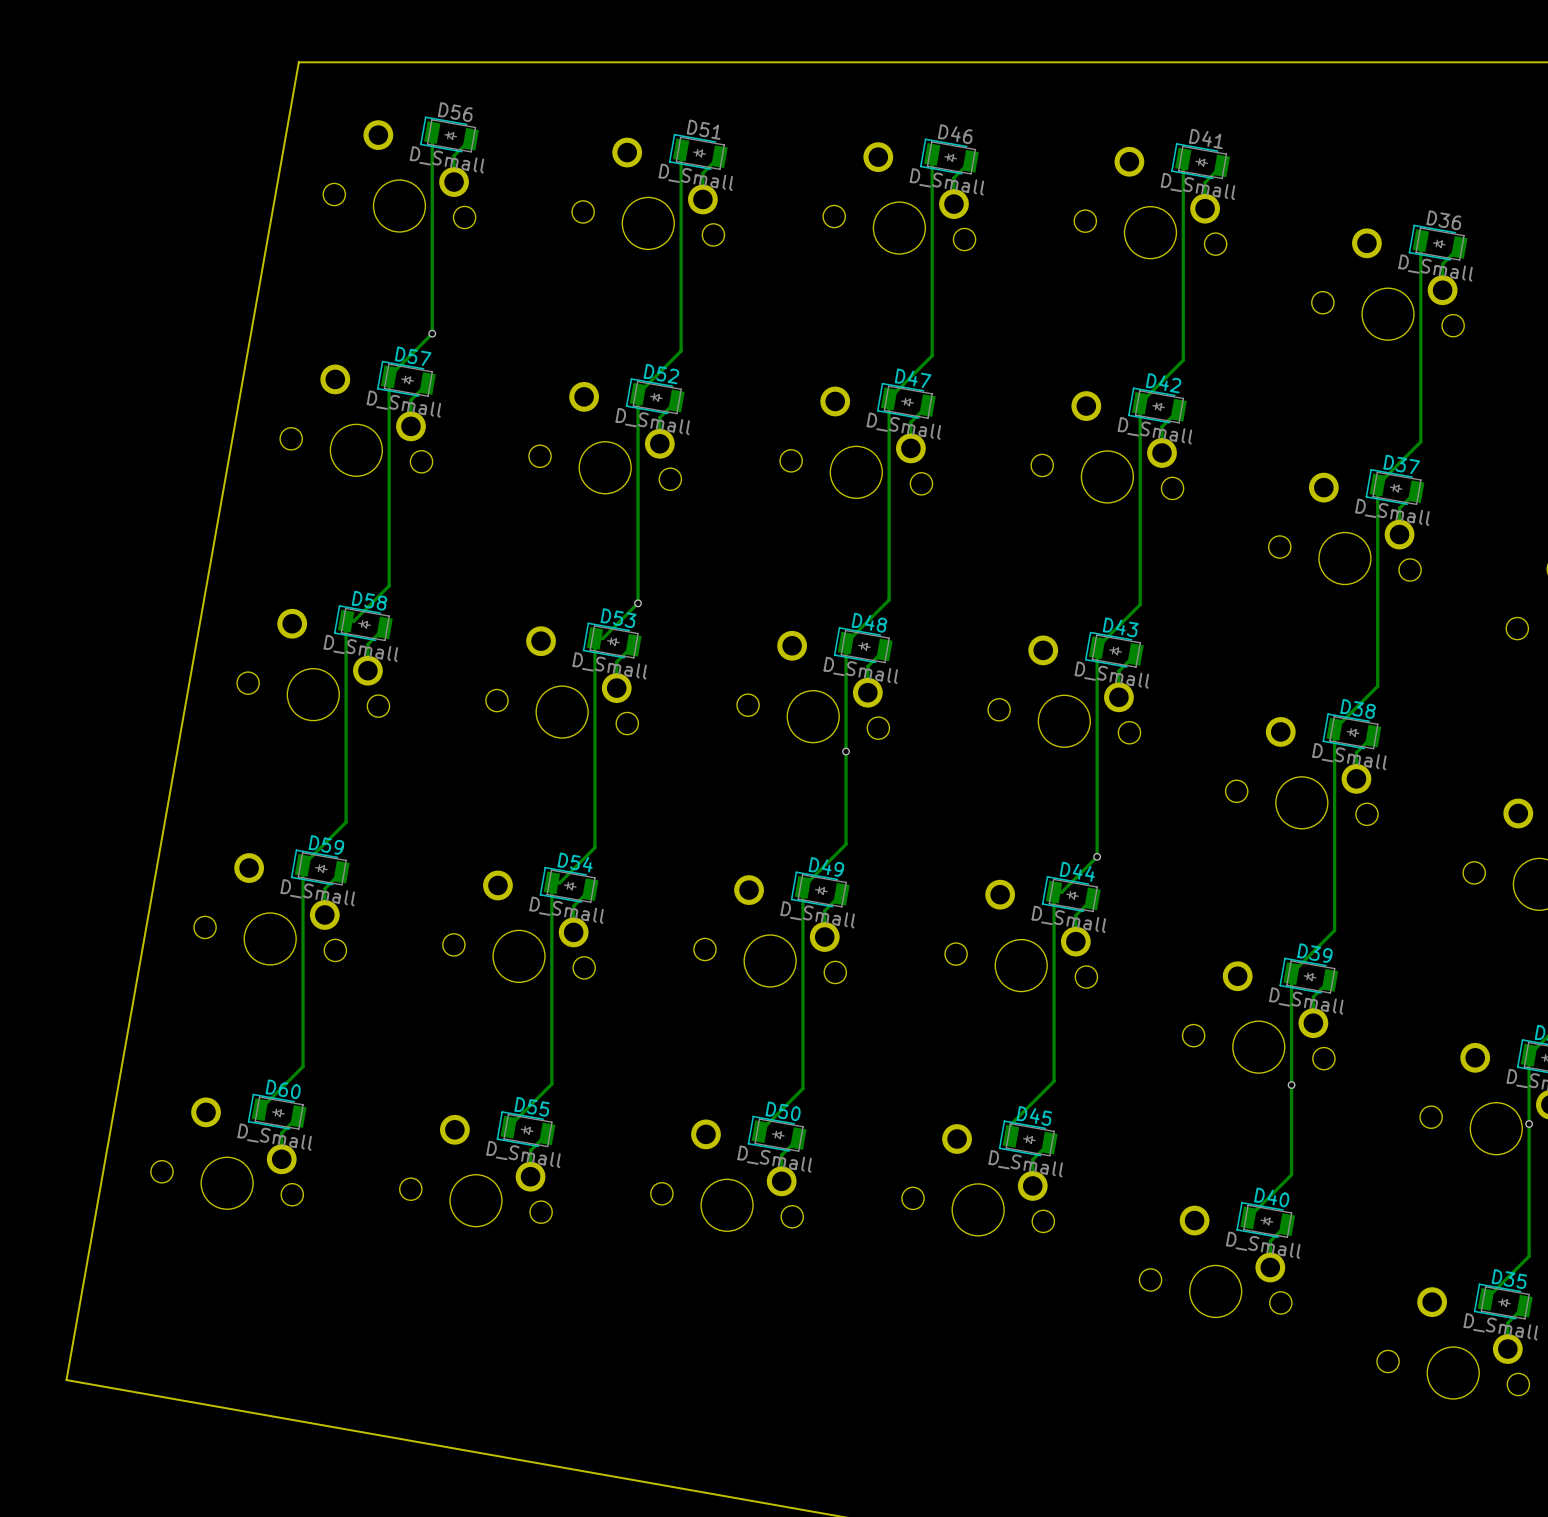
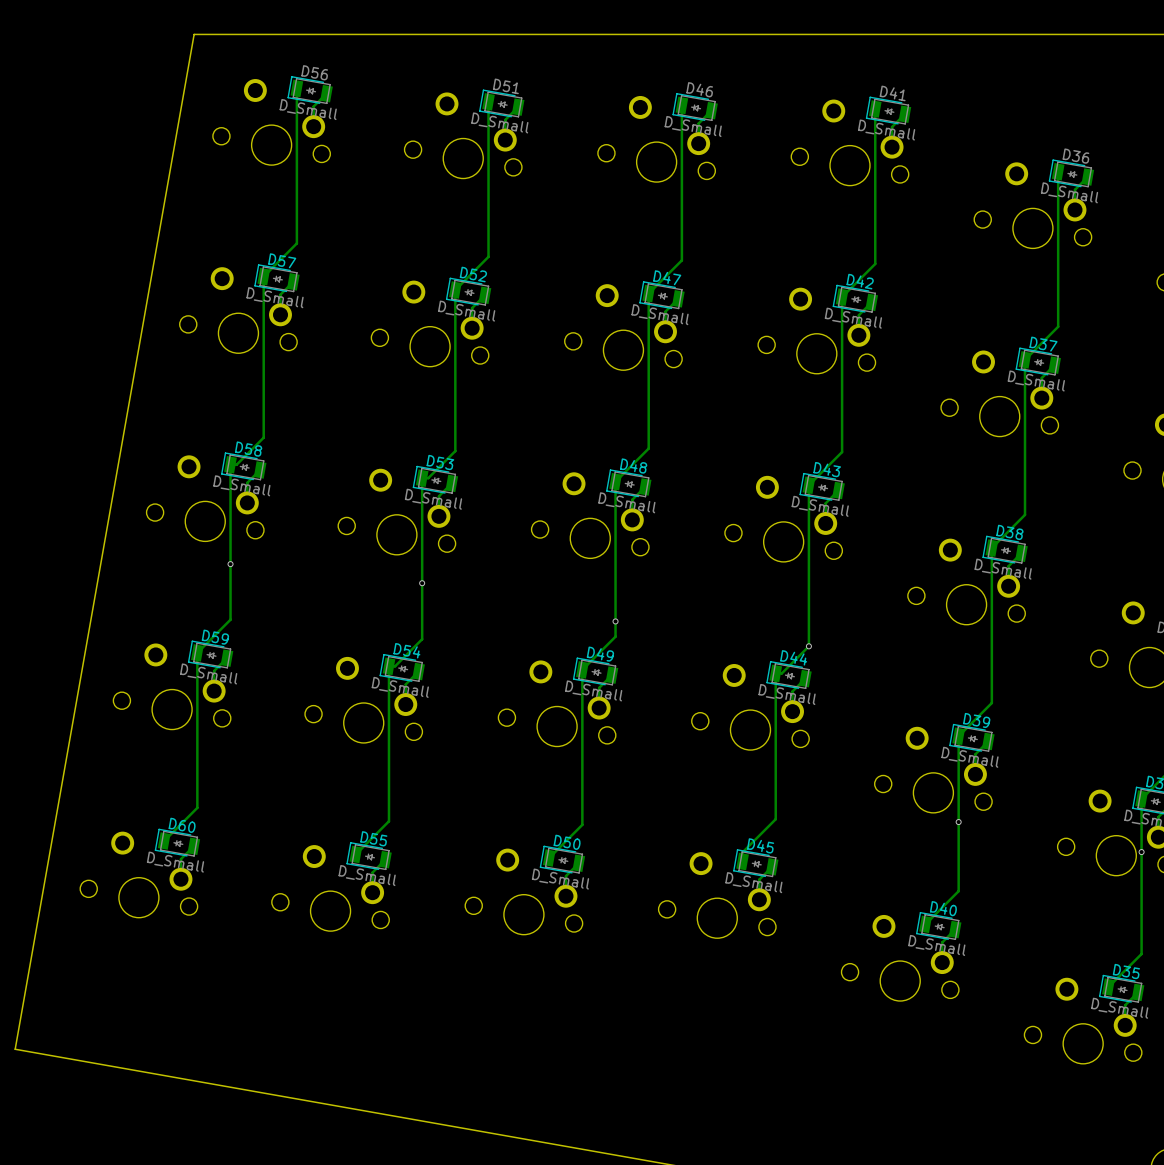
via: (432, 333) -> none
via: (638, 603) -> none
via: none -> (230, 564)
via position: (846, 751) -> (615, 621)
via: none -> (422, 583)

